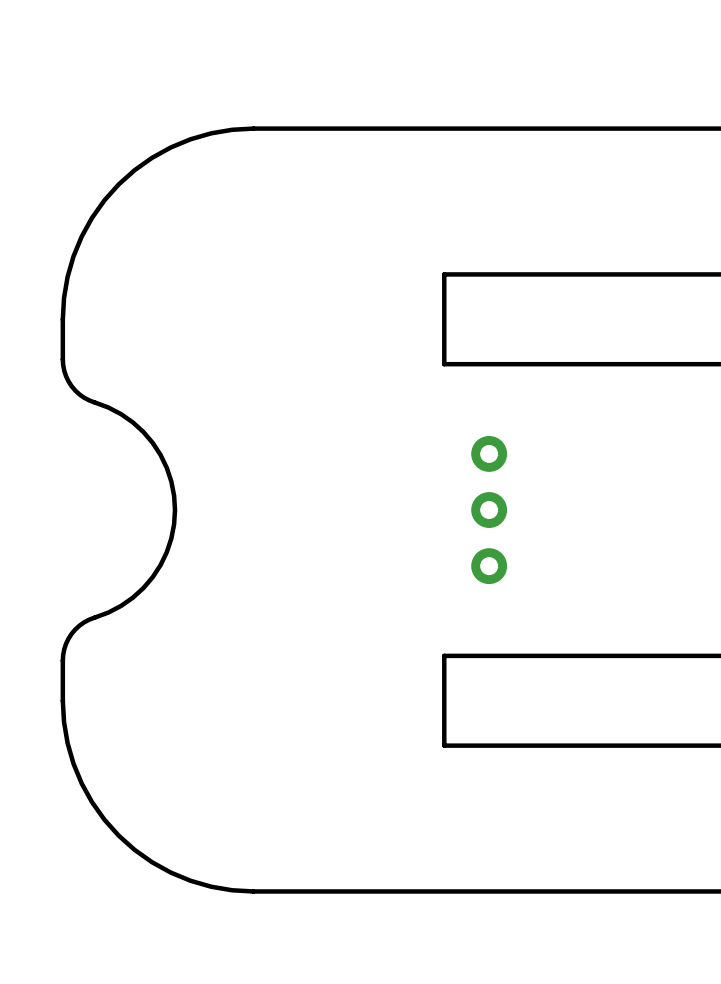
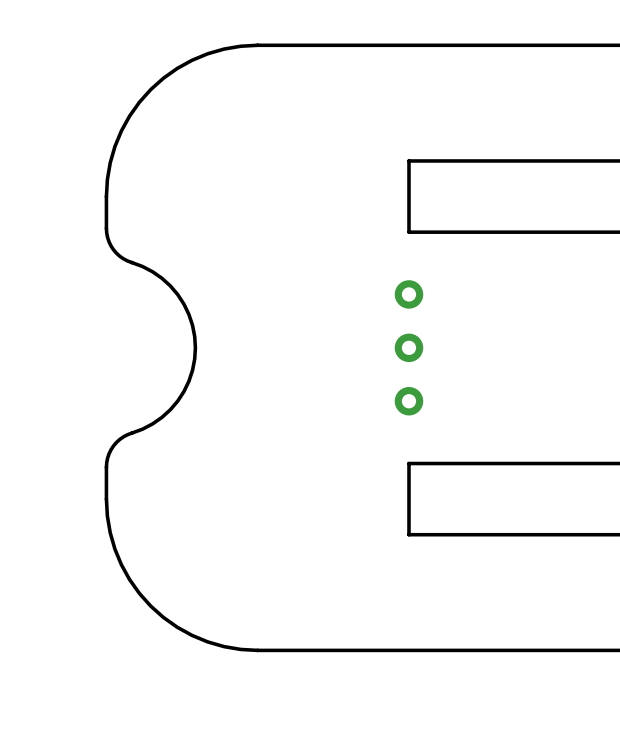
via: none -> (408, 294)
via: (489, 453) -> none
via: none -> (408, 347)
via: (489, 510) -> none
via: (489, 566) -> none
via: none -> (408, 401)

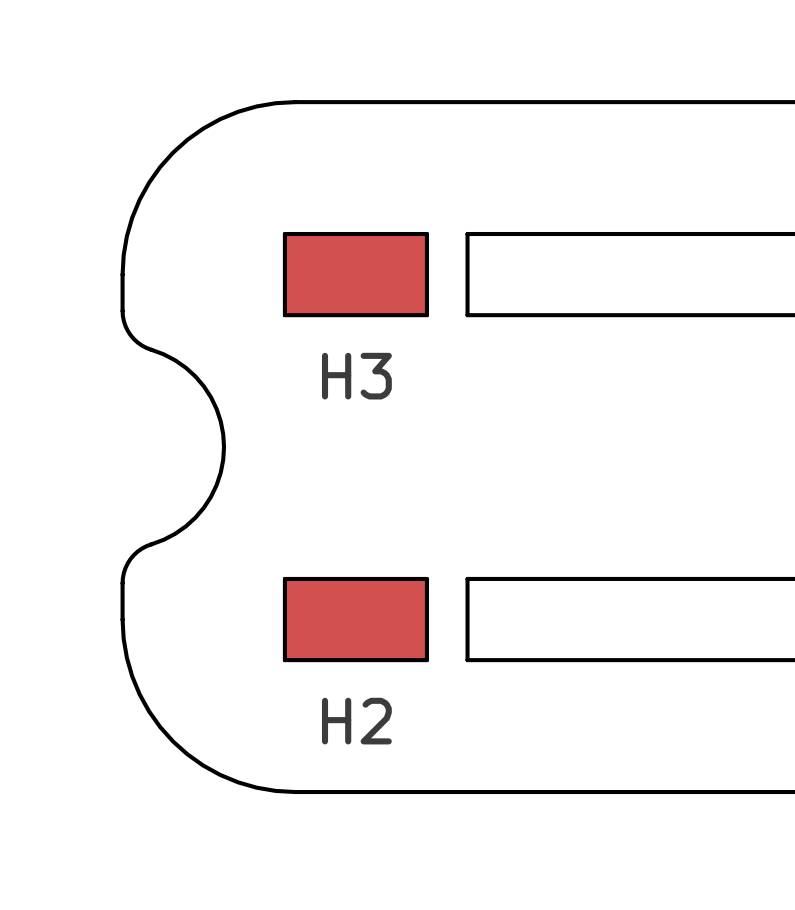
board edge: none -> (284, 234) (284, 315) (426, 315) (426, 234) (284, 234)
H3: none -> (355, 274)
via: (408, 294) -> none
via: (408, 347) -> none
via: (408, 401) -> none
board edge: none -> (284, 578) (426, 578) (426, 660) (284, 660) (284, 578)
H2: none -> (355, 619)

